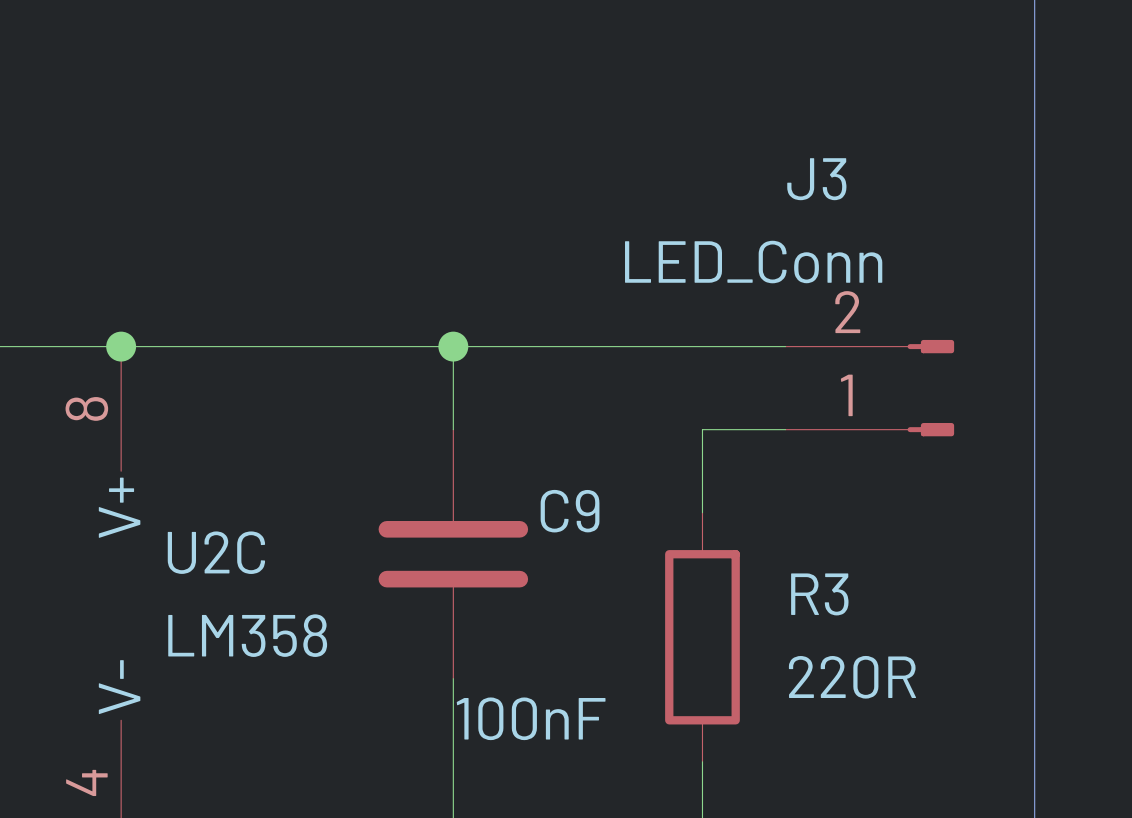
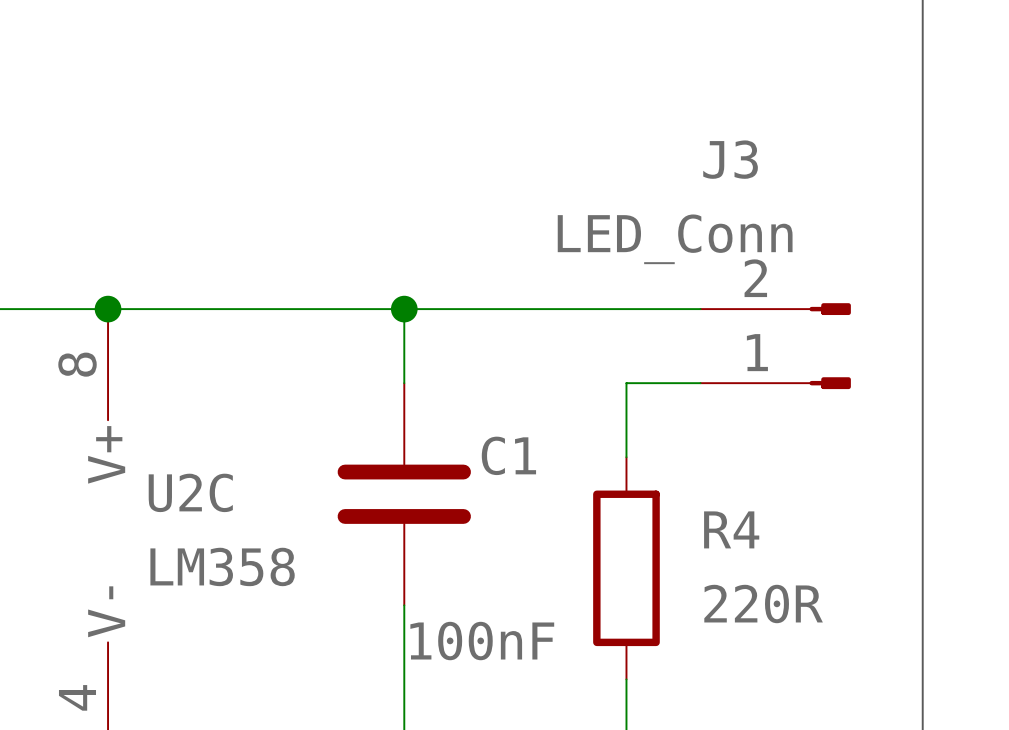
C9 name: C9 (570, 511) -> C1 (508, 455)
R3 name: R3 (819, 594) -> R4 (731, 529)

